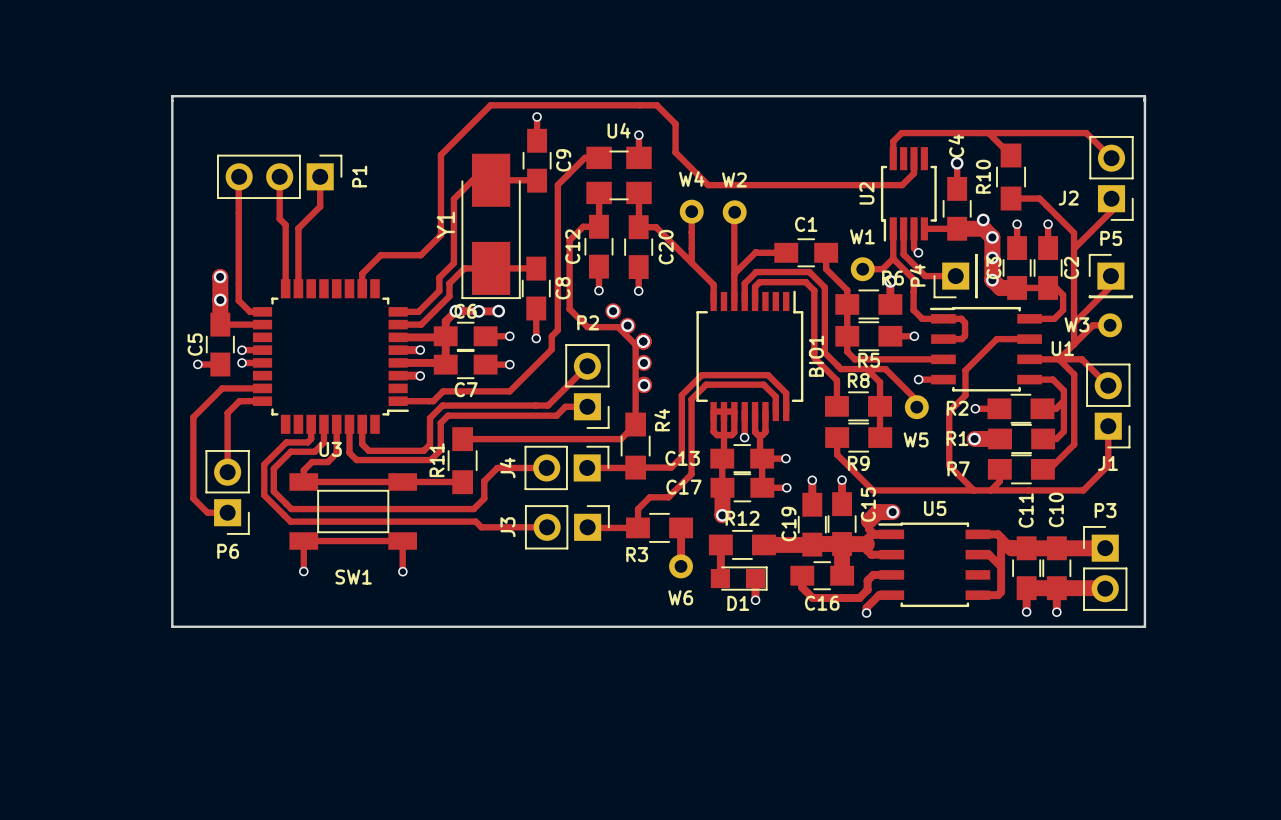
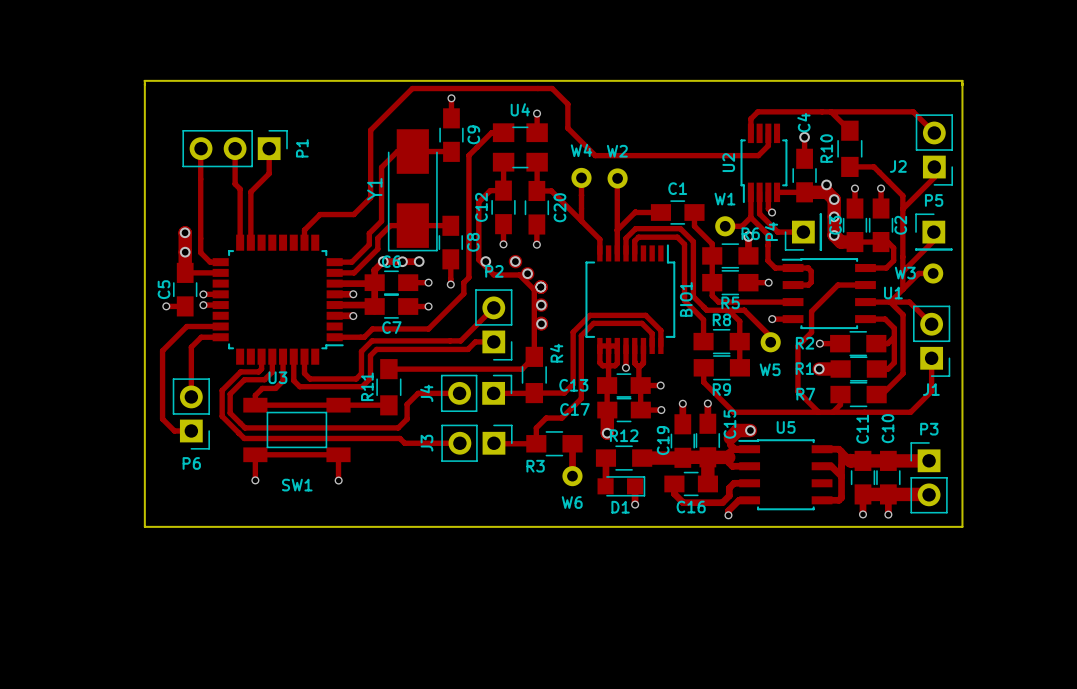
via: none -> (485, 261)

